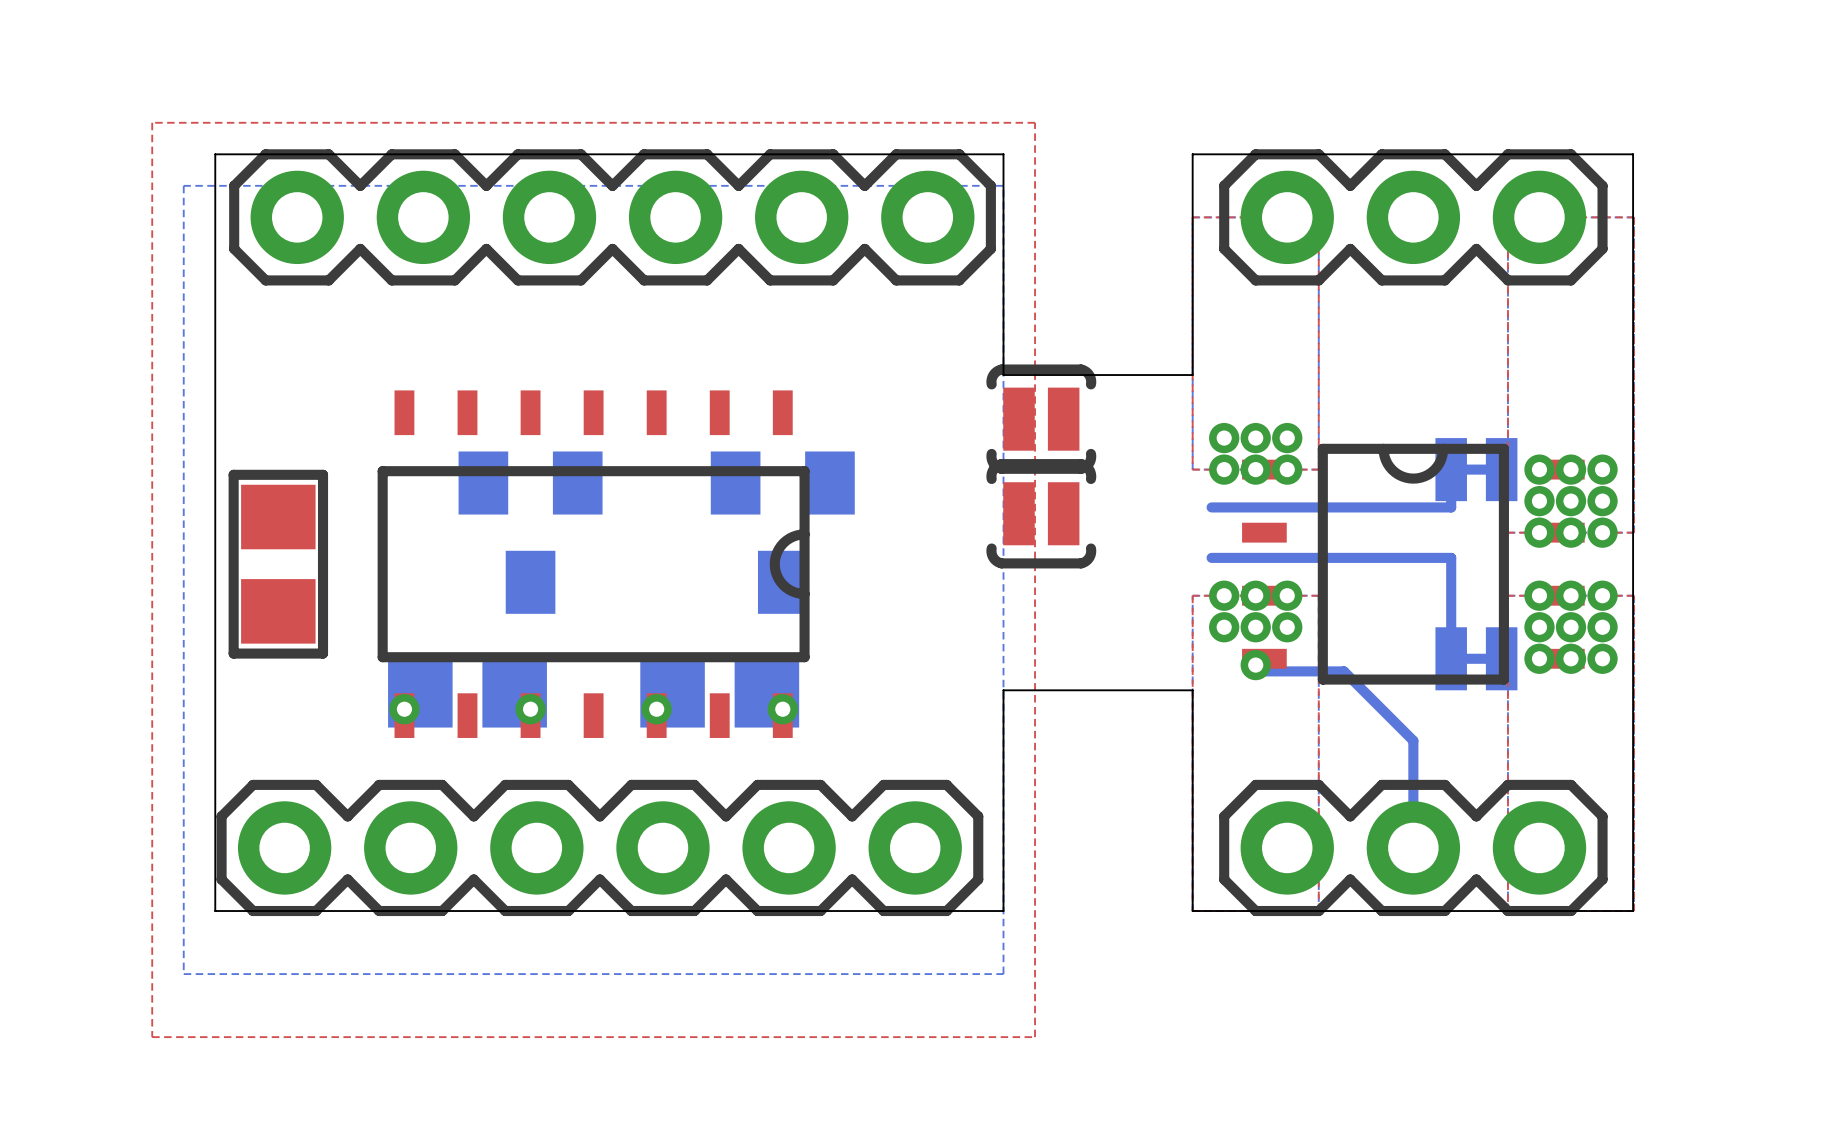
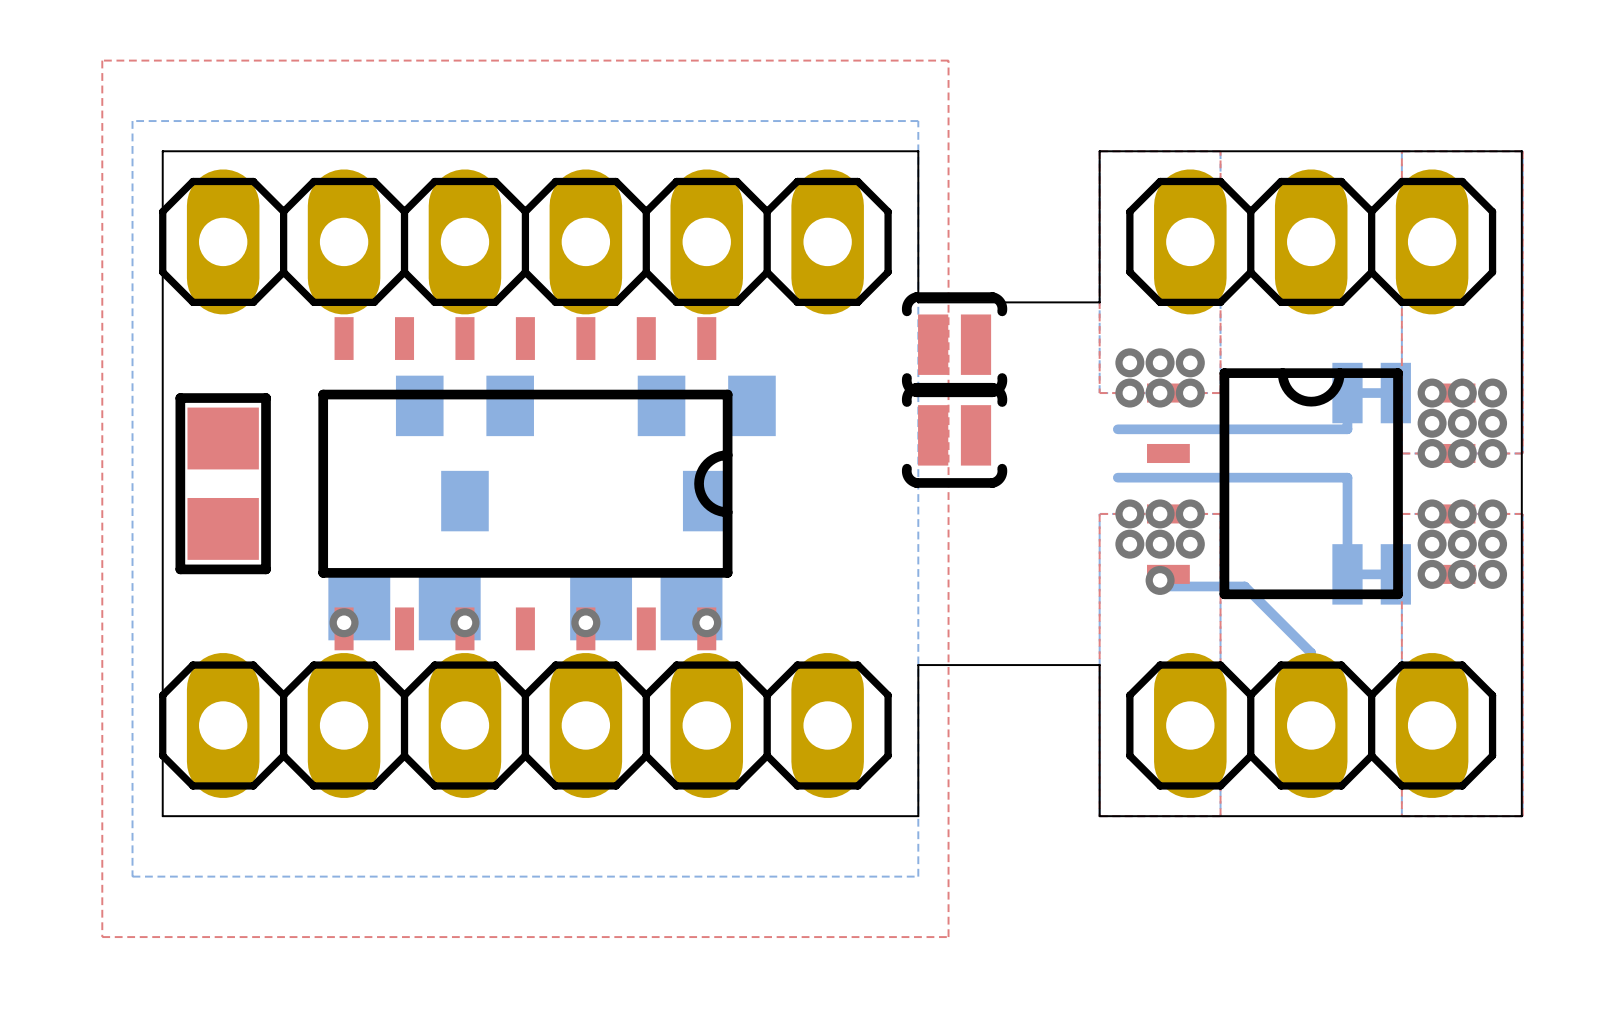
board edge: (215, 217) (215, 154) (1003, 154) (1003, 217) -> (162, 151) (918, 151)
part: (612, 217) -> none
board edge: (1192, 217) (1192, 154) (1633, 154) (1633, 217) -> (1099, 151) (1521, 151)
part: (1413, 217) -> none
part: none -> (525, 241)
part: none -> (1311, 241)
board edge: (1003, 753) (1003, 690) (1192, 690) (1192, 753) -> (918, 665) (1099, 665)
part footprint: [216, 779, 984, 917] -> [159, 652, 892, 799]
part footprint: [1219, 779, 1608, 917] -> [1126, 652, 1497, 799]

